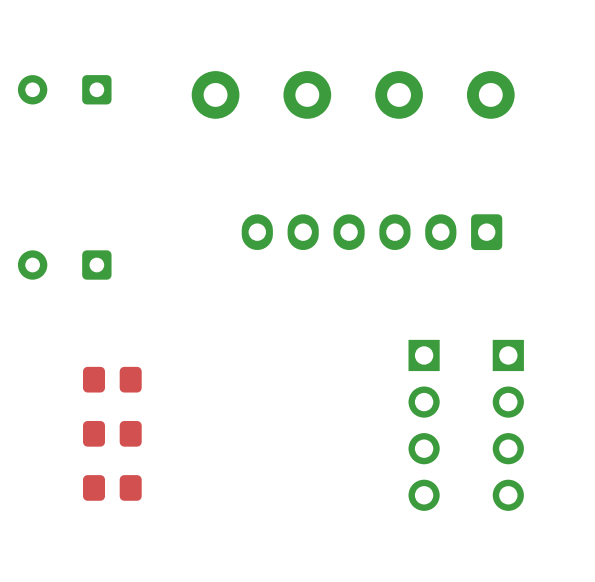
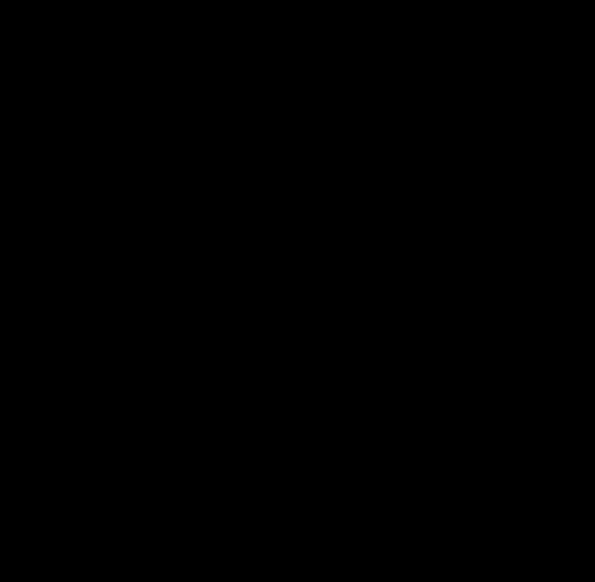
part: (64, 89) -> none
part: (353, 94) -> none
part: (371, 232) -> none
part: (64, 265) -> none
part: (112, 379) -> none
part: (424, 425) -> none
part: (508, 425) -> none
part: (112, 433) -> none
part: (112, 487) -> none

